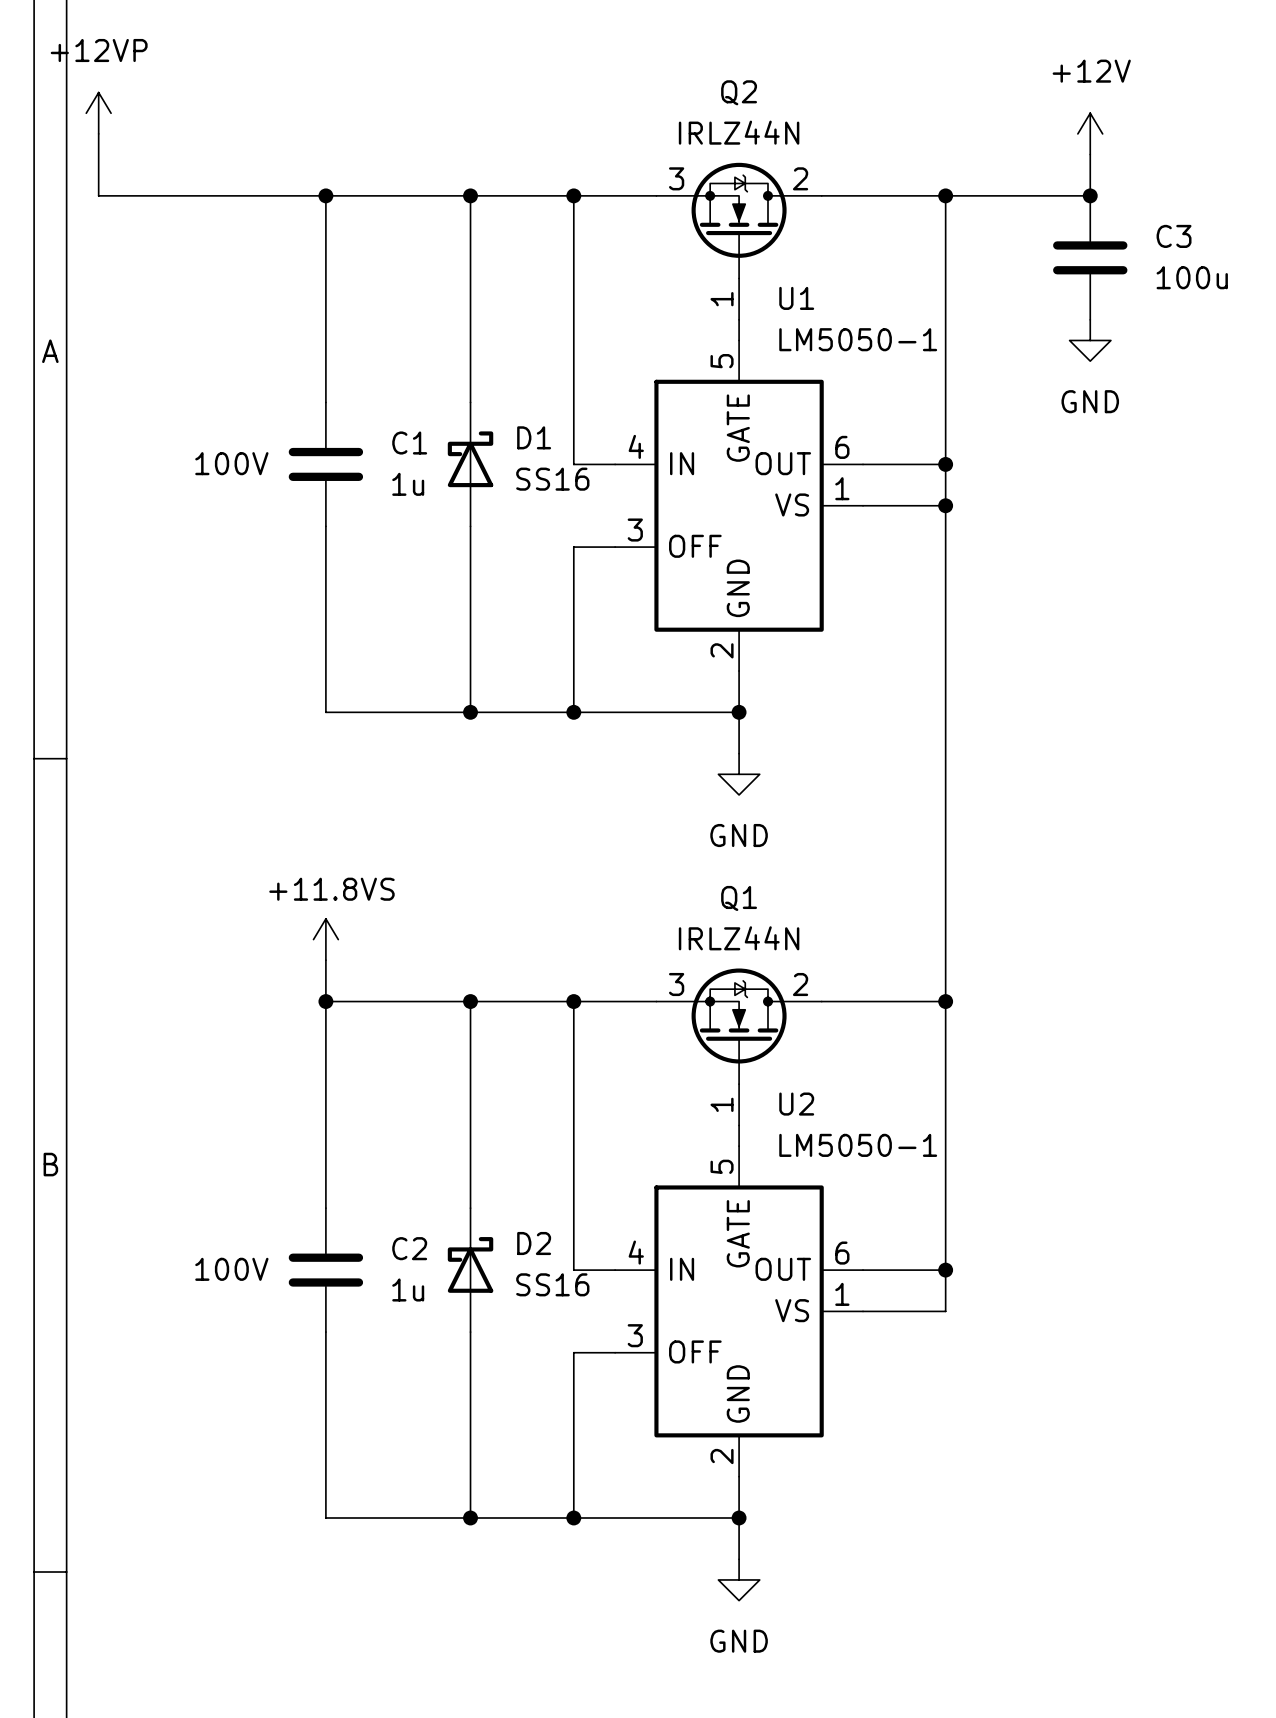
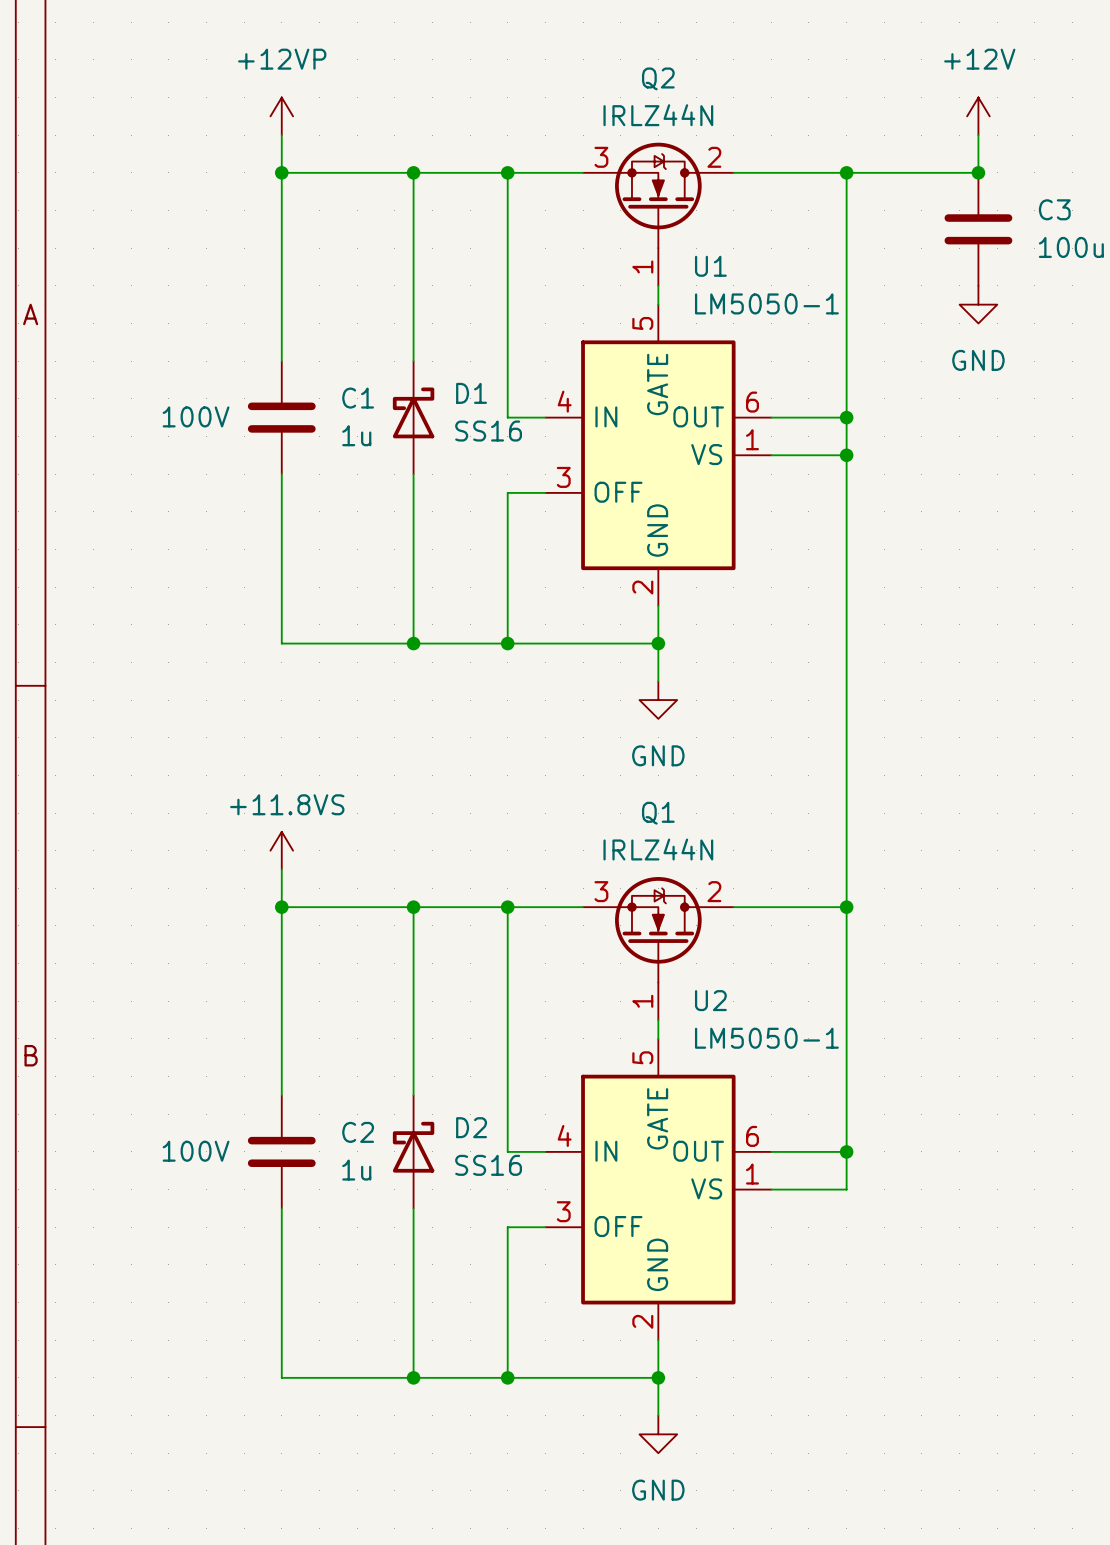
power symbol position: +12VP (98, 113) -> +12VP (281, 116)
wire: (98, 133) (98, 195) (325, 195) -> (281, 135) (281, 172)

